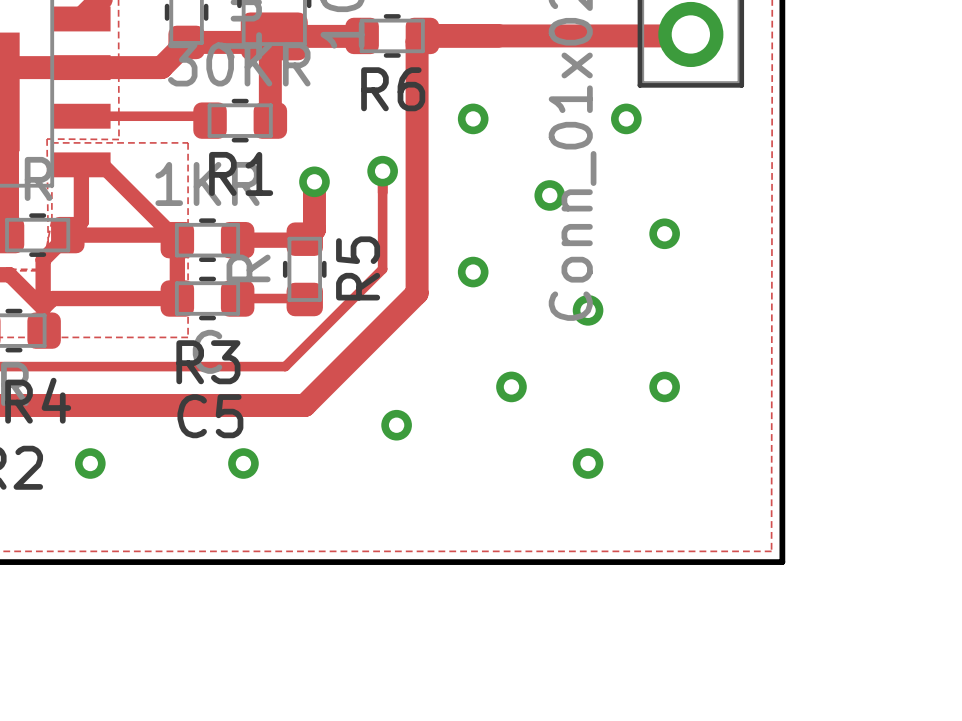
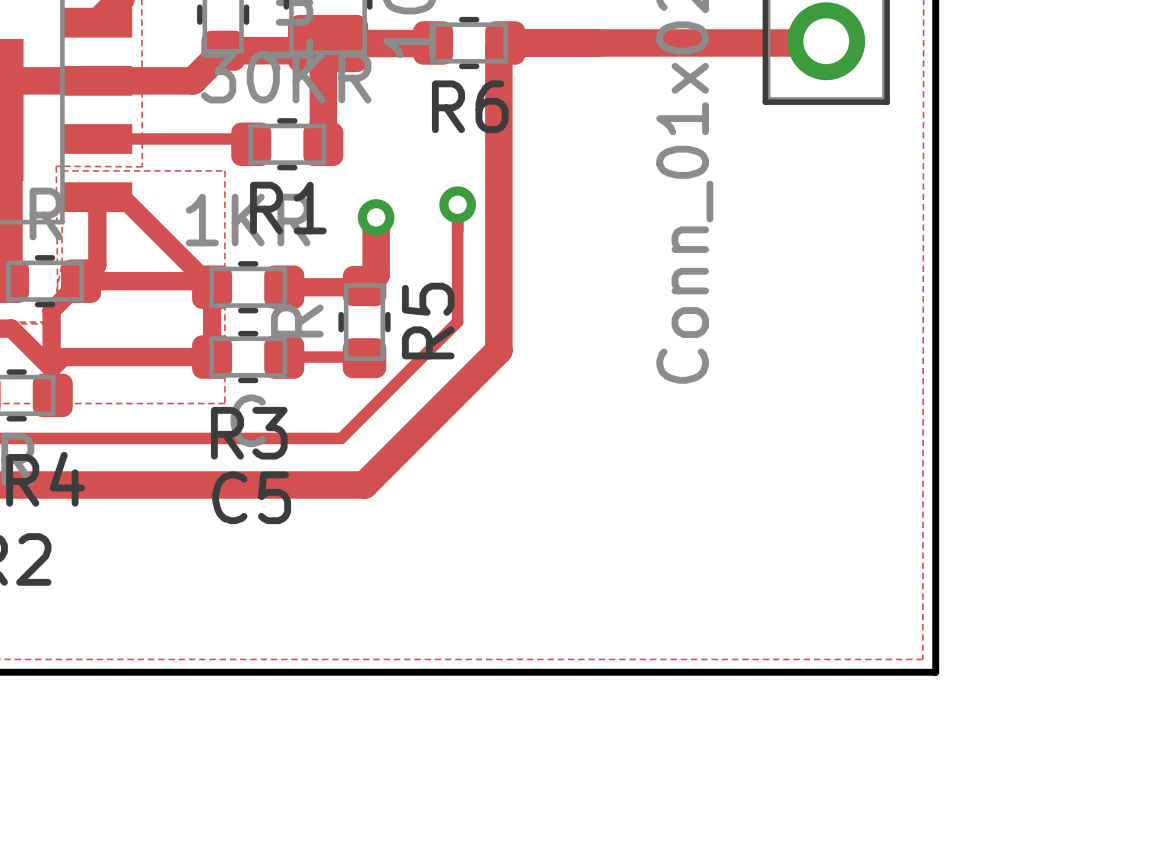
via: (473, 118) -> none
via: (626, 118) -> none
via: (549, 195) -> none
via: (664, 233) -> none
via: (473, 272) -> none
via: (588, 310) -> none
via: (511, 386) -> none
via: (664, 386) -> none
via: (396, 425) -> none
via: (90, 463) -> none
via: (243, 463) -> none
via: (588, 463) -> none

